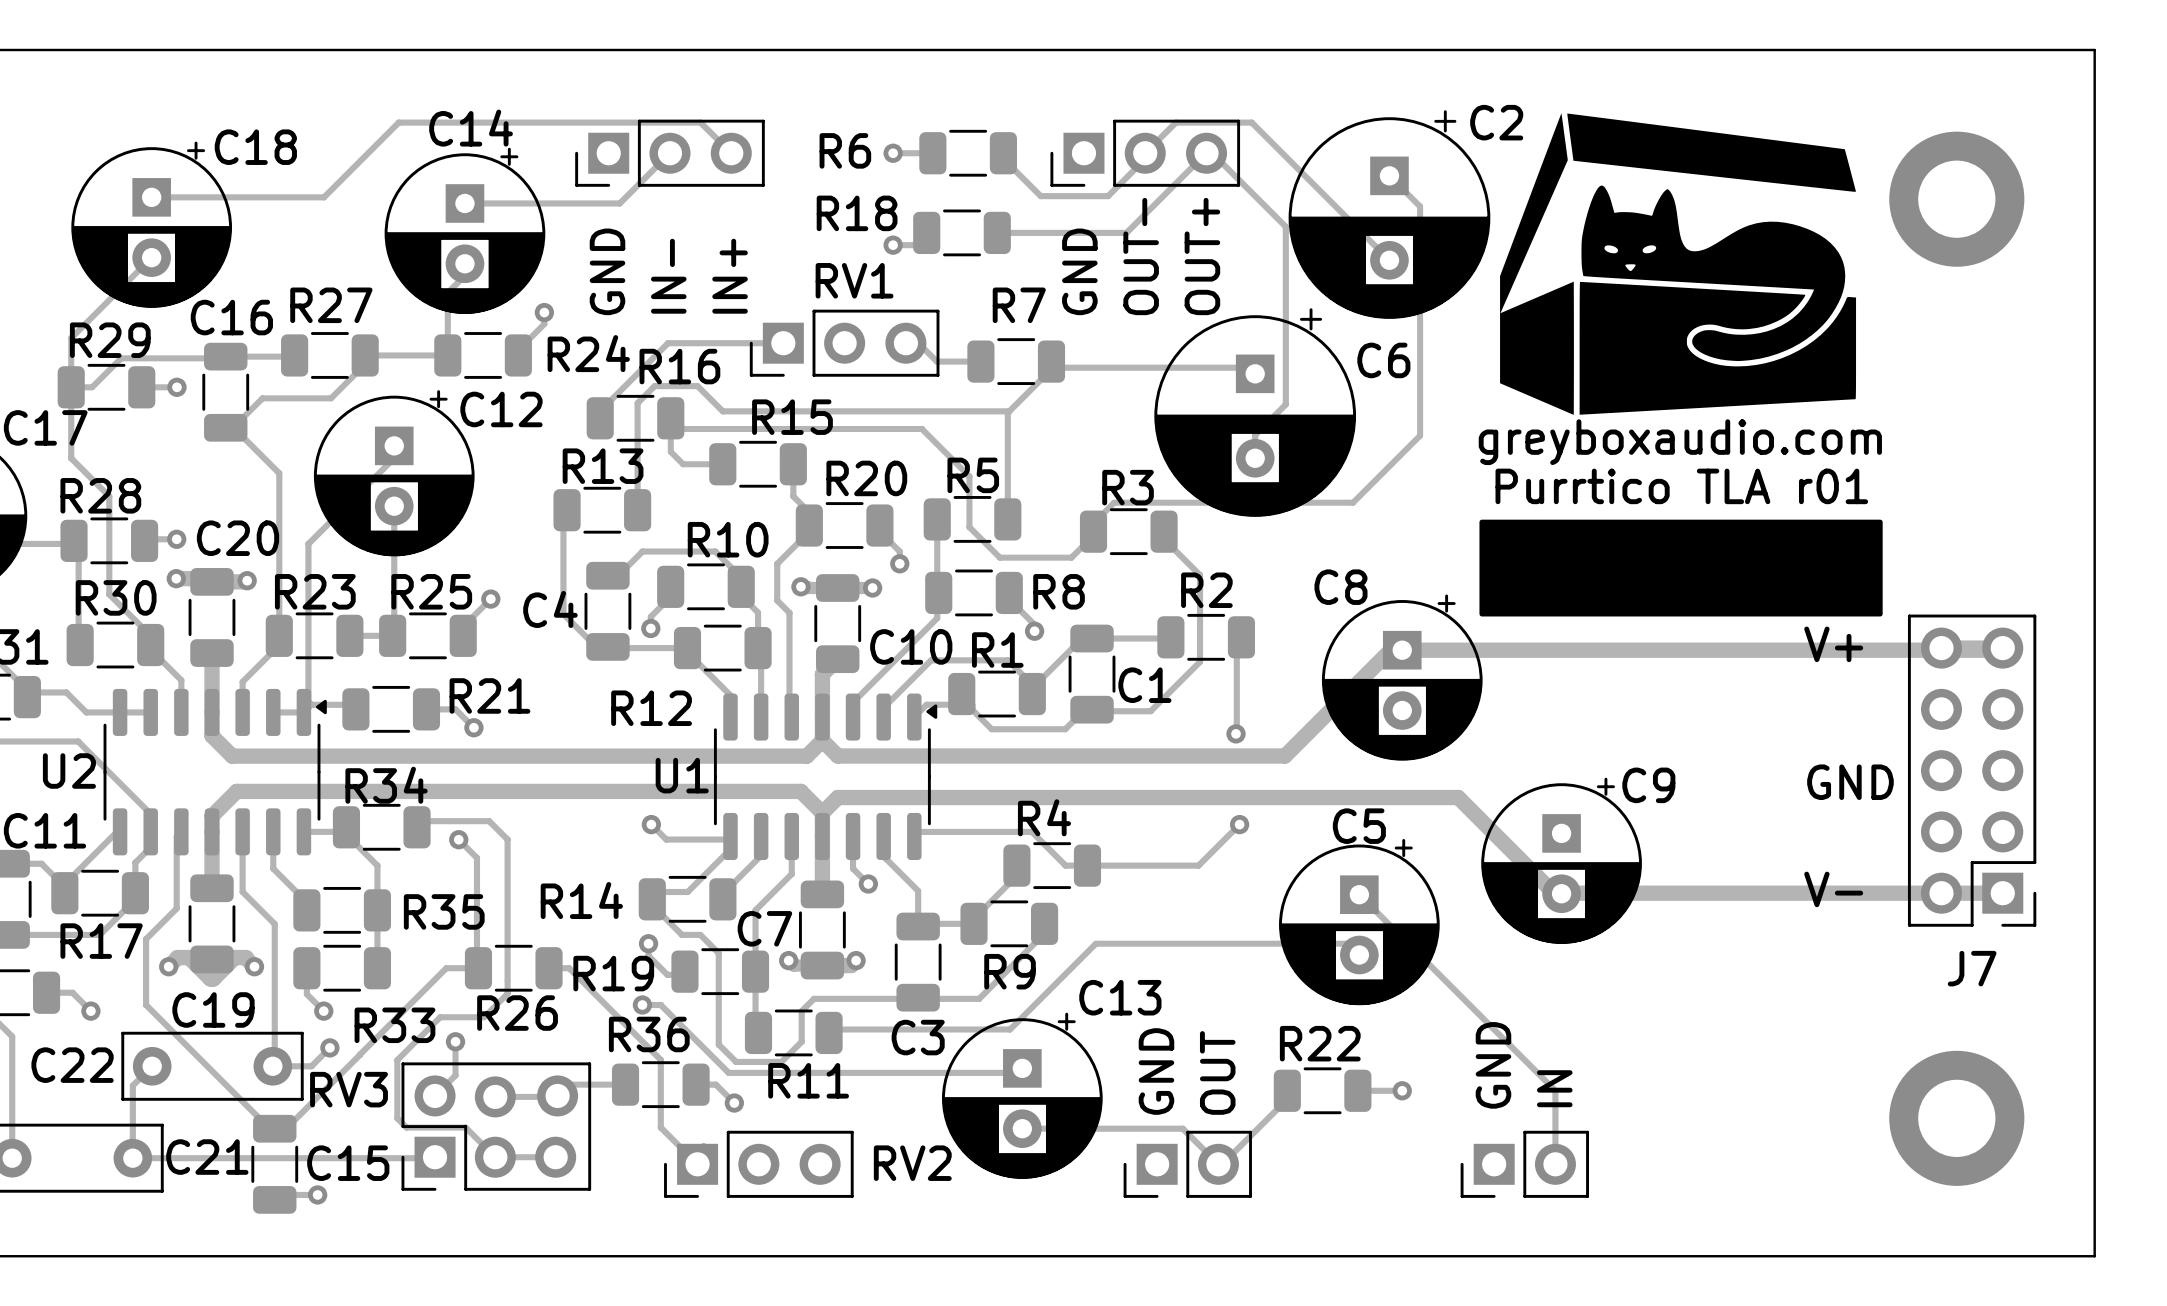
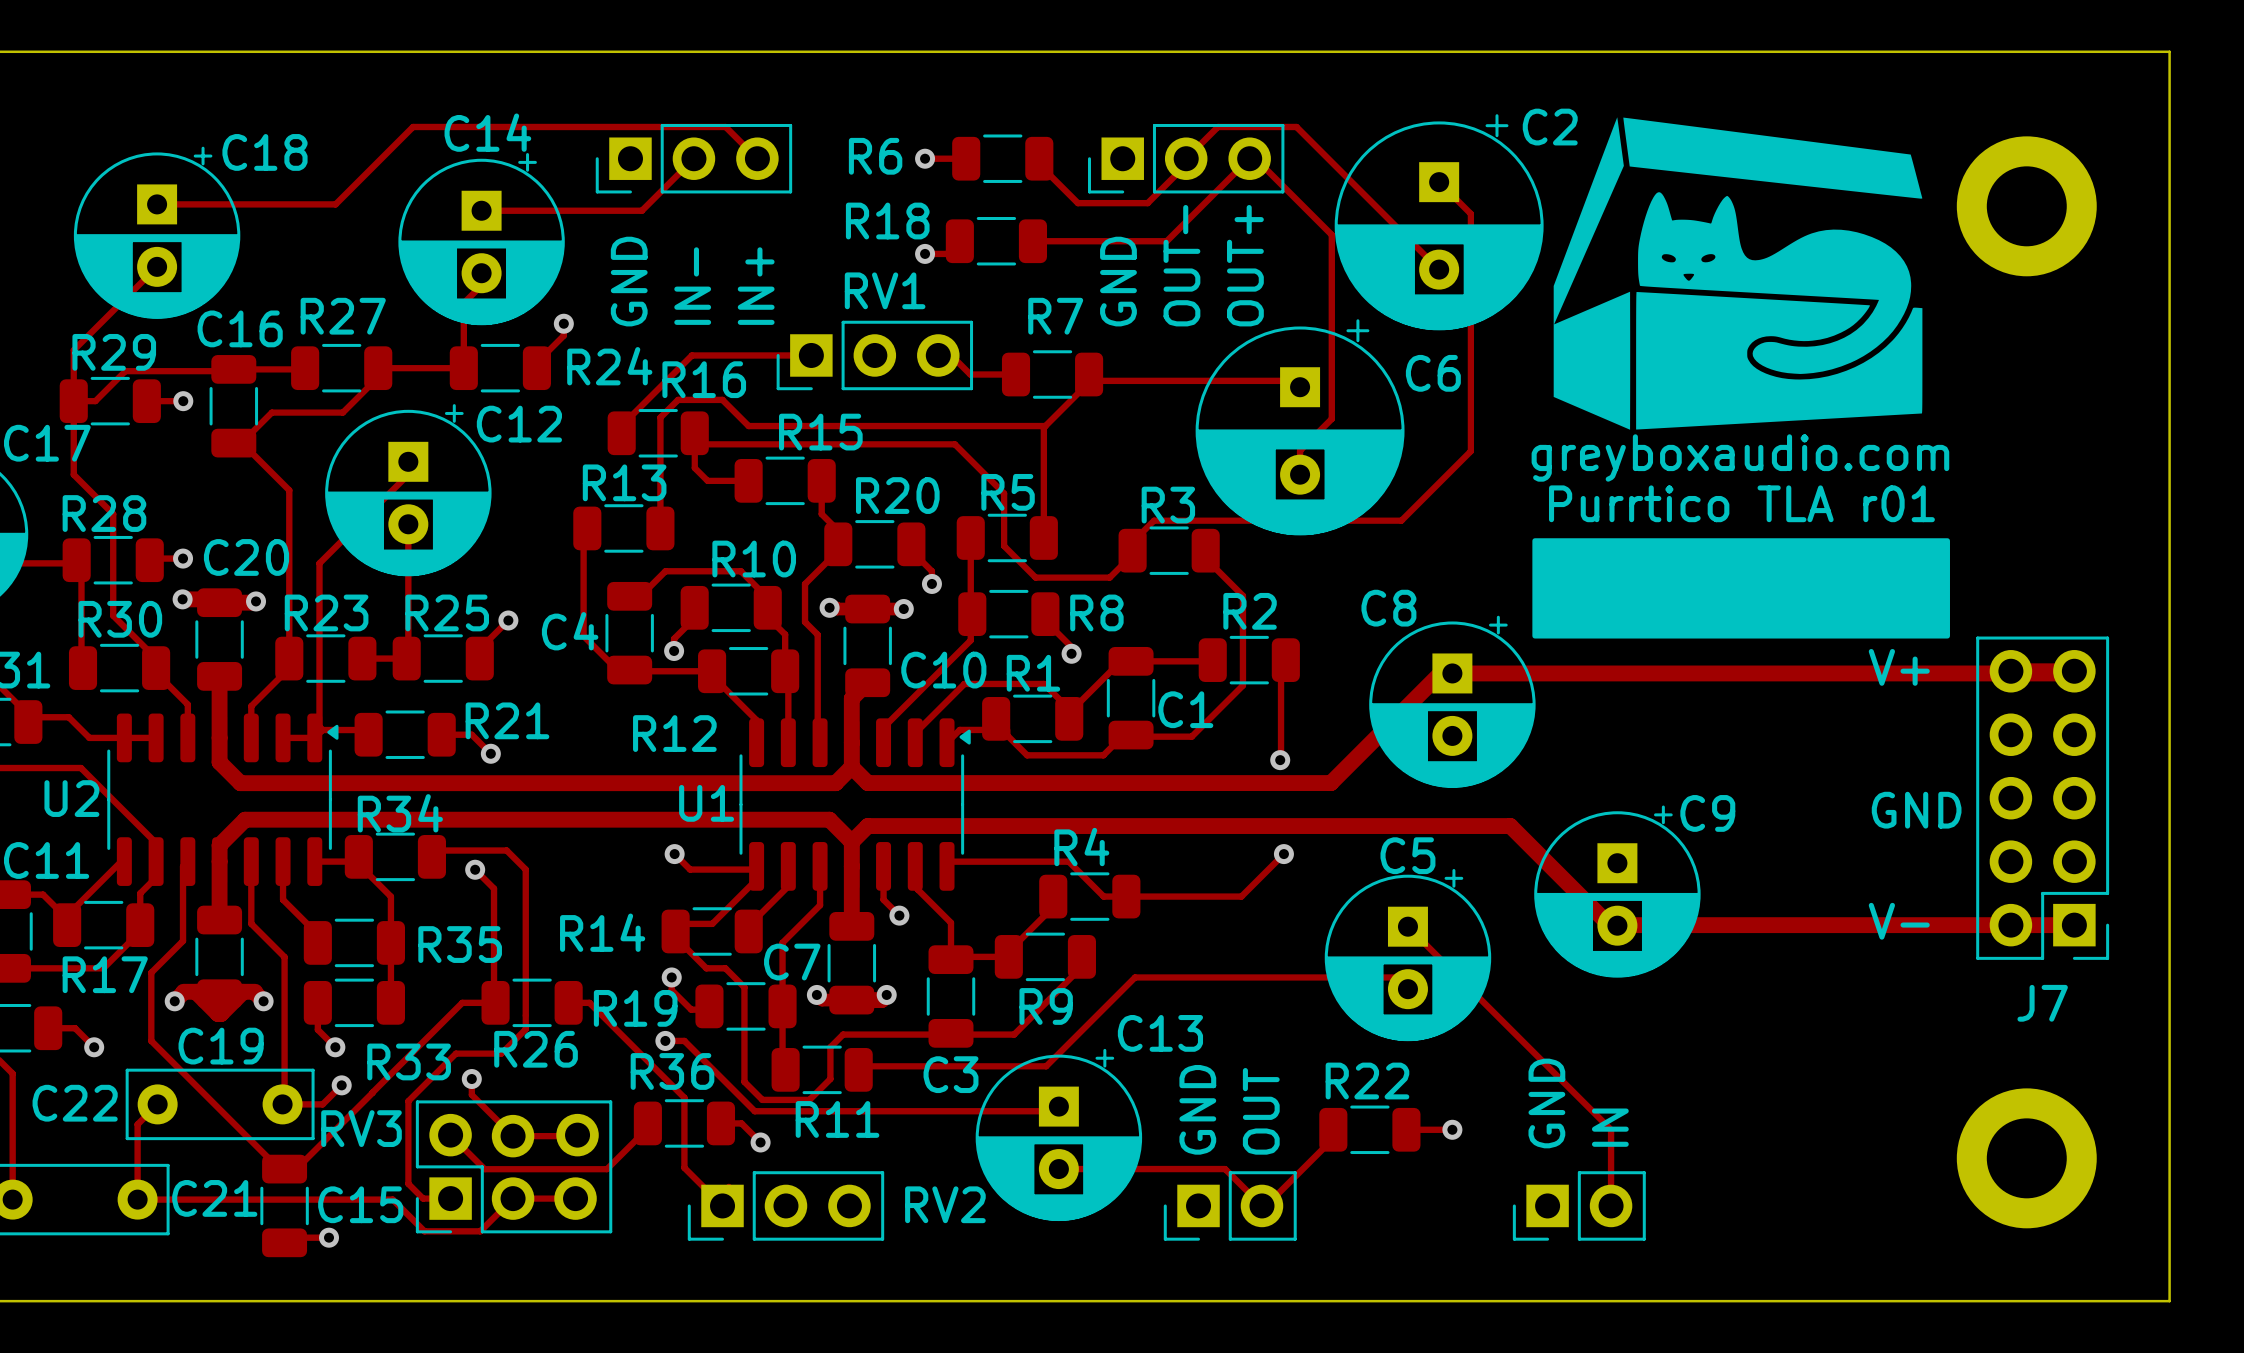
track: (455, 1057) (455, 1075) (435, 1095) -> (471, 1094) (513, 1136)
track: (397, 1060) (397, 1118) (406, 1127) (465, 1127) (495, 1157) -> (411, 1098) (408, 1101) (408, 1183) (423, 1198) (450, 1198)
track: (568, 1084) (625, 1084) -> none
track: none -> (647, 1128) (606, 1169) (484, 1169) (450, 1135)
track: (379, 1158) (434, 1158) -> (392, 1199) (424, 1231) (480, 1231) (513, 1198)

